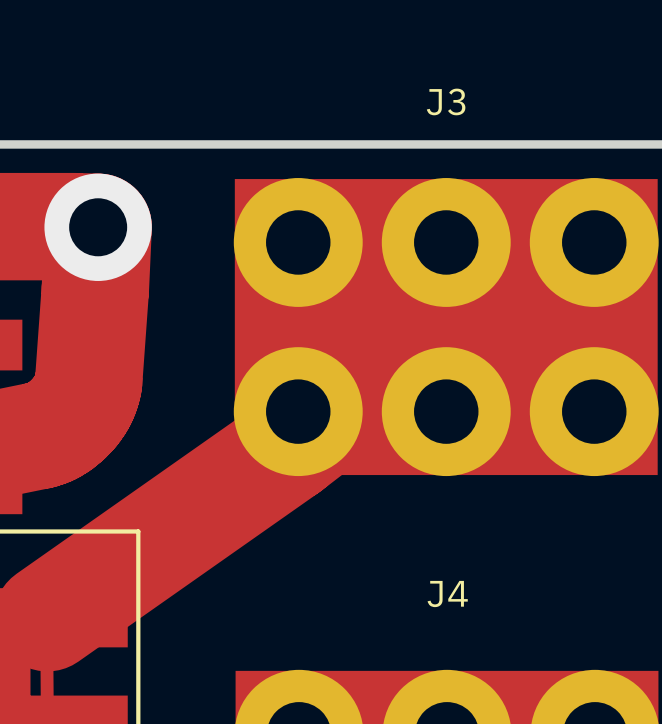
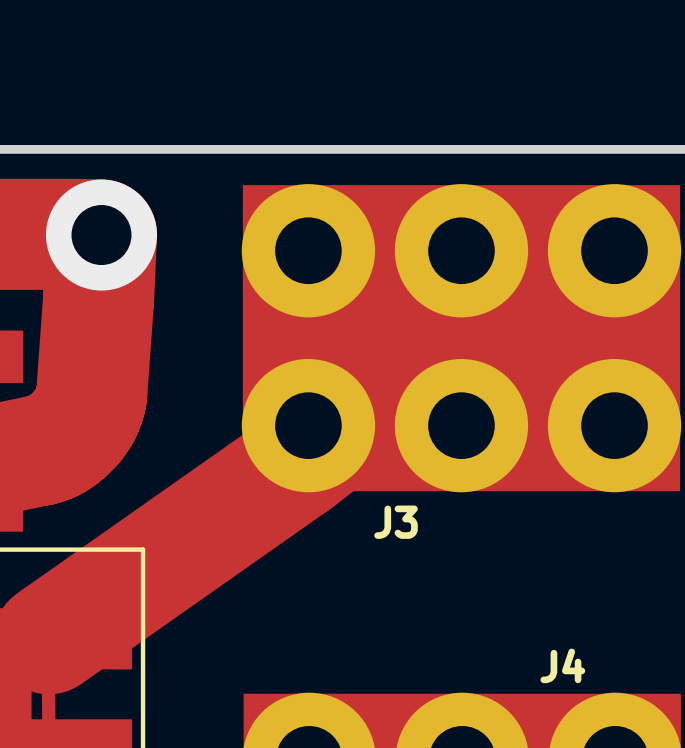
J3 name position: J3 (446, 101) -> J3 (396, 522)
J4 name position: J4 (447, 594) -> J4 (562, 665)

